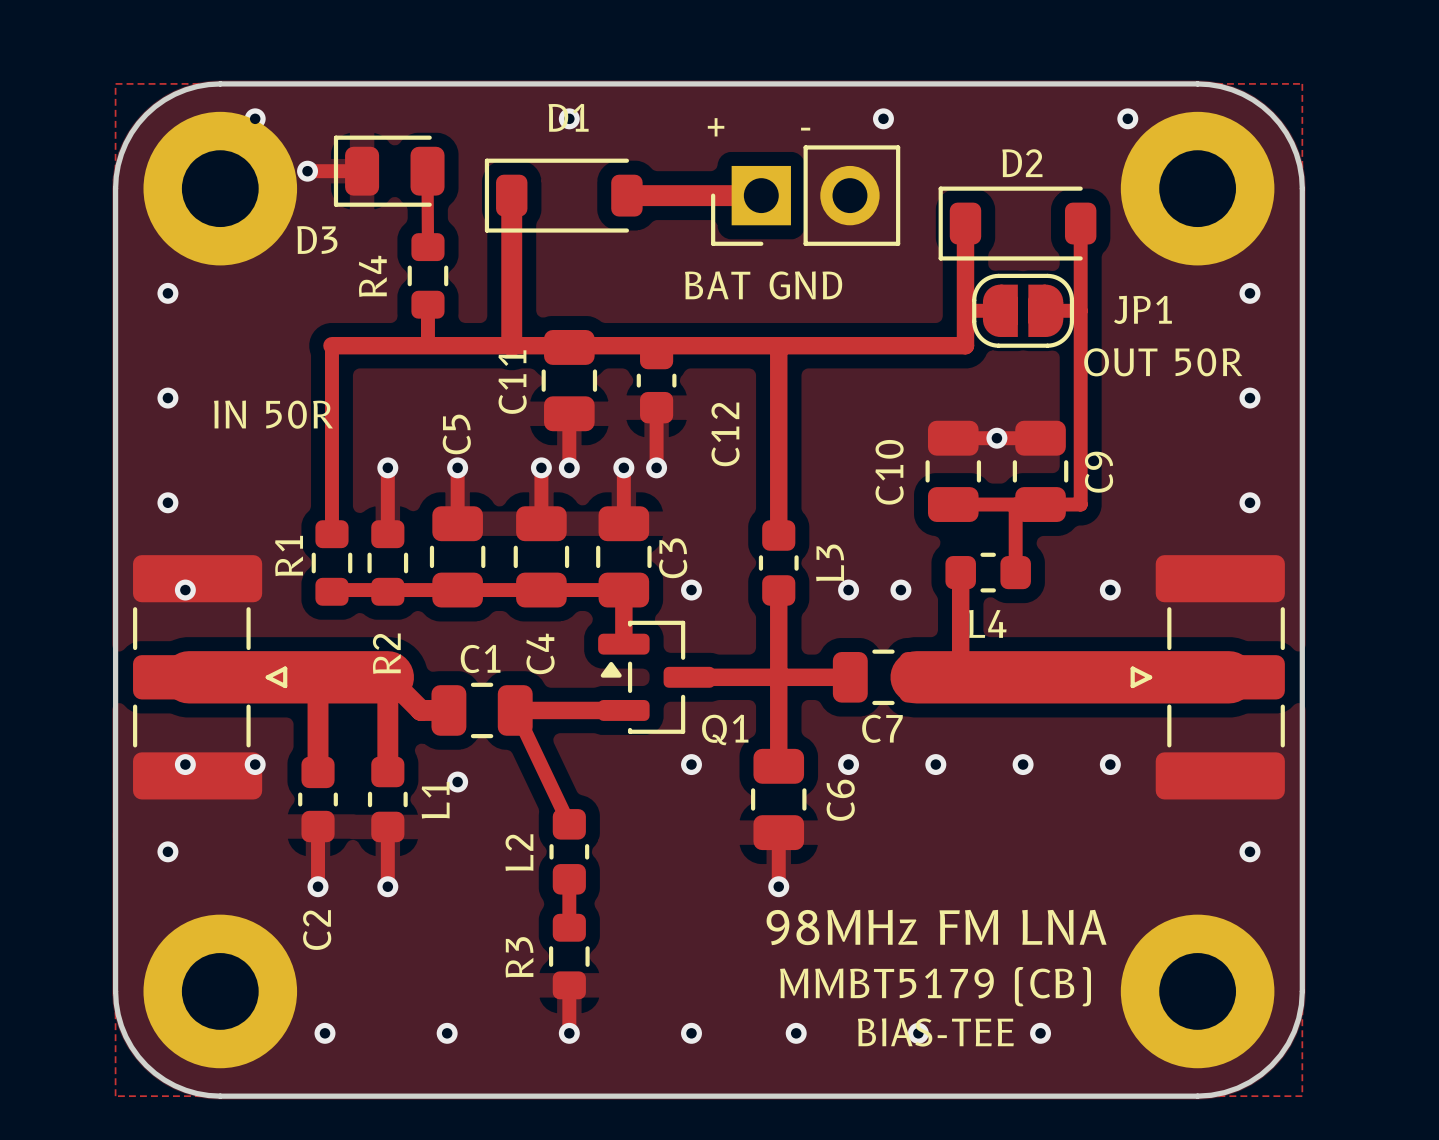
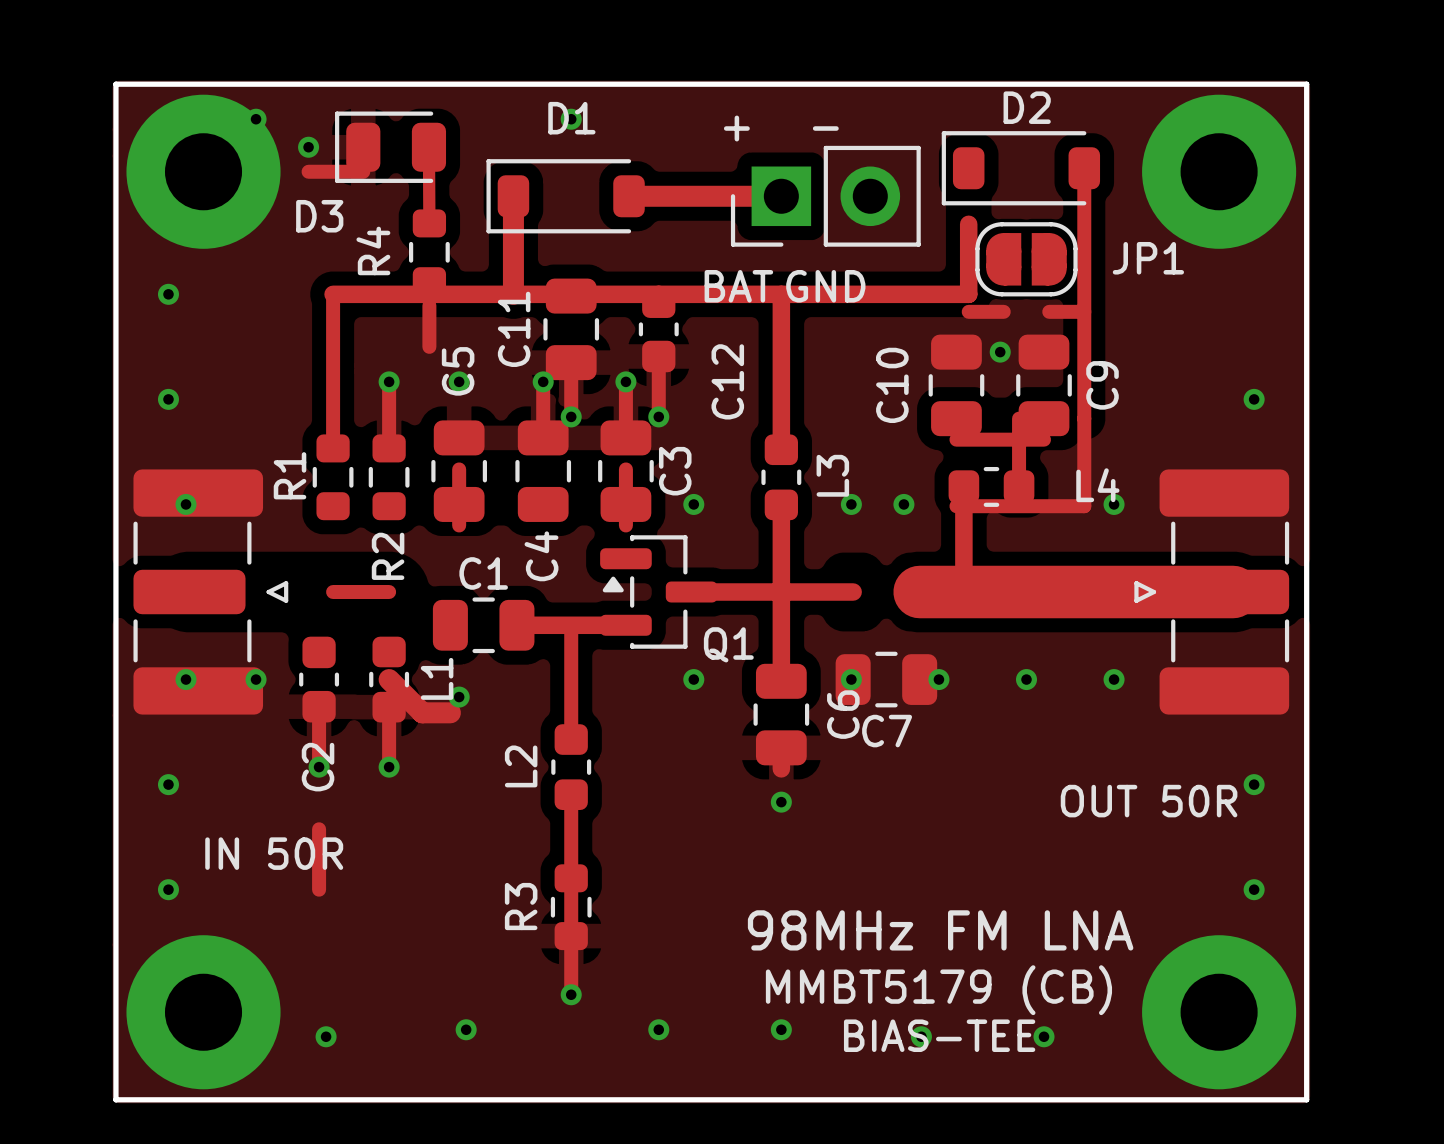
board edge: (220, 83) (185, 89) (164, 99) (146, 114) (125, 143) (118, 165) (115, 188) -> (221, 84) (115, 84) (115, 189)
board edge: (1197, 83) (1220, 86) (1243, 94) (1271, 114) (1291, 143) (1299, 165) (1302, 188) -> (1201, 84) (1306, 84) (1306, 189)
via: (883, 118) -> none
via: (1127, 118) -> none
text position: + (716, 127) -> + (736, 128)
text position: - (805, 129) -> - (825, 128)
track: none -> (1084, 168) (1084, 224)
via position: (307, 171) -> (308, 147)
D3 position: (389, 171) -> (390, 147)
track: (427, 171) (427, 247) -> (428, 147) (429, 223)
part position: (220, 188) -> (203, 171)
part position: (1197, 188) -> (1219, 171)
part position: (805, 195) -> (825, 196)
D2 position: (1017, 223) -> (1020, 168)
R4 position: (427, 275) -> (429, 252)
text position: BAT (717, 285) -> BAT (738, 286)
text position: GND (805, 285) -> GND (825, 286)
track: (511, 293) (511, 345) -> (781, 294) (781, 346)
track: (965, 293) (965, 345) (331, 345) -> (968, 294) (333, 294) (333, 346)
via: (1249, 293) -> none
JP1 position: (1023, 310) -> (1026, 259)
via: none -> (1000, 352)
text position: OUT 50R (1163, 362) -> OUT 50R (1149, 801)
via: none -> (389, 381)
via: none -> (459, 381)
via: none -> (543, 381)
C11 position: (569, 380) -> (571, 329)
track: none -> (625, 381) (625, 437)
via: none -> (625, 381)
C12 position: (656, 380) -> (658, 329)
text position: IN 50R (273, 414) -> IN 50R (274, 853)
track: (569, 415) (569, 467) -> (571, 362) (571, 415)
via: none -> (571, 416)
track: (656, 415) (656, 467) -> (658, 356) (658, 409)
via: none -> (658, 416)
C5 name position: C5 (456, 434) -> C5 (458, 371)
via: (996, 438) -> none
track: (331, 446) (331, 534) -> none
track: (778, 448) (778, 503) -> (781, 537) (781, 592)
track: (387, 467) (387, 534) -> (389, 381) (389, 448)
via: (387, 467) -> none
via: (457, 467) -> none
track: (541, 467) (541, 523) -> (543, 381) (543, 437)
via: (541, 467) -> none
via: (569, 467) -> none
via: (623, 467) -> none
via: (656, 467) -> none
C10 position: (953, 471) -> (956, 385)
C9 position: (1040, 471) -> (1044, 385)
via position: (167, 502) -> (186, 504)
via: none -> (693, 504)
via: none -> (851, 504)
via: none -> (903, 504)
via: none -> (1114, 504)
via: (1249, 502) -> none
track: (1015, 504) (1015, 572) -> (1019, 418) (1019, 486)
R1 name position: R1 (289, 556) -> R1 (290, 475)
C5 position: (457, 556) -> (459, 471)
C4 position: (541, 556) -> (543, 471)
C3 position: (623, 556) -> (625, 471)
R1 position: (331, 562) -> (333, 477)
R2 position: (387, 562) -> (389, 477)
L3 position: (778, 562) -> (781, 477)
L4 position: (988, 572) -> (991, 486)
via: (185, 590) -> none
track: (387, 590) (623, 590) (623, 644) -> none
via: (691, 590) -> none
via: (848, 590) -> none
via: (900, 590) -> none
track: (960, 590) (960, 677) -> (963, 486) (963, 574)
via: (1110, 590) -> none
track: none -> (516, 625) (625, 625)
track: none -> (571, 625) (571, 739)
L4 name position: L4 (987, 623) -> L4 (1097, 485)
R2 name position: R2 (386, 653) -> R2 (388, 556)
C4 name position: C4 (540, 653) -> C4 (541, 556)
via: none -> (186, 679)
track: (188, 677) (387, 677) (387, 704) -> none
part position: (210, 677) -> (210, 592)
via: none -> (256, 679)
Q1 position: (656, 677) -> (658, 592)
track: (689, 677) (850, 677) -> (691, 592) (853, 592)
via: none -> (693, 679)
via: none -> (851, 679)
track: (916, 677) (1229, 677) -> (919, 592) (1233, 592)
via: none -> (938, 679)
via: none -> (1026, 679)
via: none -> (1114, 679)
part position: (1207, 677) -> (1211, 592)
track: (778, 679) (778, 745) -> none
via: none -> (459, 697)
track width: thick (318, 704) (318, 764) -> thin (319, 706) (319, 767)
track width: thick (387, 704) (387, 764) -> thin (389, 707) (389, 767)
C1 position: (482, 710) -> (483, 625)
track: (623, 710) (515, 710) (569, 824) -> none
via position: (185, 764) -> (168, 784)
via: (255, 764) -> none
via: none -> (319, 767)
via: none -> (389, 767)
via: (691, 764) -> none
via: (848, 764) -> none
via: (935, 764) -> none
via: (1023, 764) -> none
via: (1110, 764) -> none
via: (457, 782) -> none
via: none -> (1254, 784)
track: none -> (571, 794) (571, 878)
C2 position: (318, 799) -> (319, 679)
L1 position: (387, 799) -> (389, 679)
C6 position: (778, 799) -> (781, 714)
via: none -> (781, 802)
track: (387, 826) (387, 886) -> none
track: (778, 832) (778, 886) -> none
via: (167, 851) -> none
L2 position: (569, 851) -> (571, 767)
via: (1249, 851) -> none
via: none -> (168, 889)
via: (318, 886) -> none
via: (387, 886) -> none
via: (778, 886) -> none
via: none -> (1254, 889)
C2 name position: C2 (317, 930) -> C2 (318, 767)
track: none -> (571, 936) (571, 988)
R3 position: (569, 956) -> (571, 907)
board edge: (115, 991) (118, 1014) (125, 1036) (146, 1065) (174, 1085) (196, 1093) (220, 1096) -> (115, 994) (115, 1099) (221, 1099)
part position: (220, 991) -> (203, 1012)
track: (569, 991) (569, 1033) -> none
part position: (1197, 991) -> (1219, 1012)
board edge: (1302, 991) (1298, 1018) (1294, 1031) (1288, 1043) (1271, 1065) (1249, 1082) (1237, 1088) (1211, 1095) (1197, 1096) -> (1306, 994) (1306, 1099) (1201, 1099)
via position: (447, 1033) -> (466, 1029)
via position: (569, 1033) -> (571, 994)
via position: (691, 1033) -> (658, 1029)
via position: (796, 1033) -> (781, 1029)

